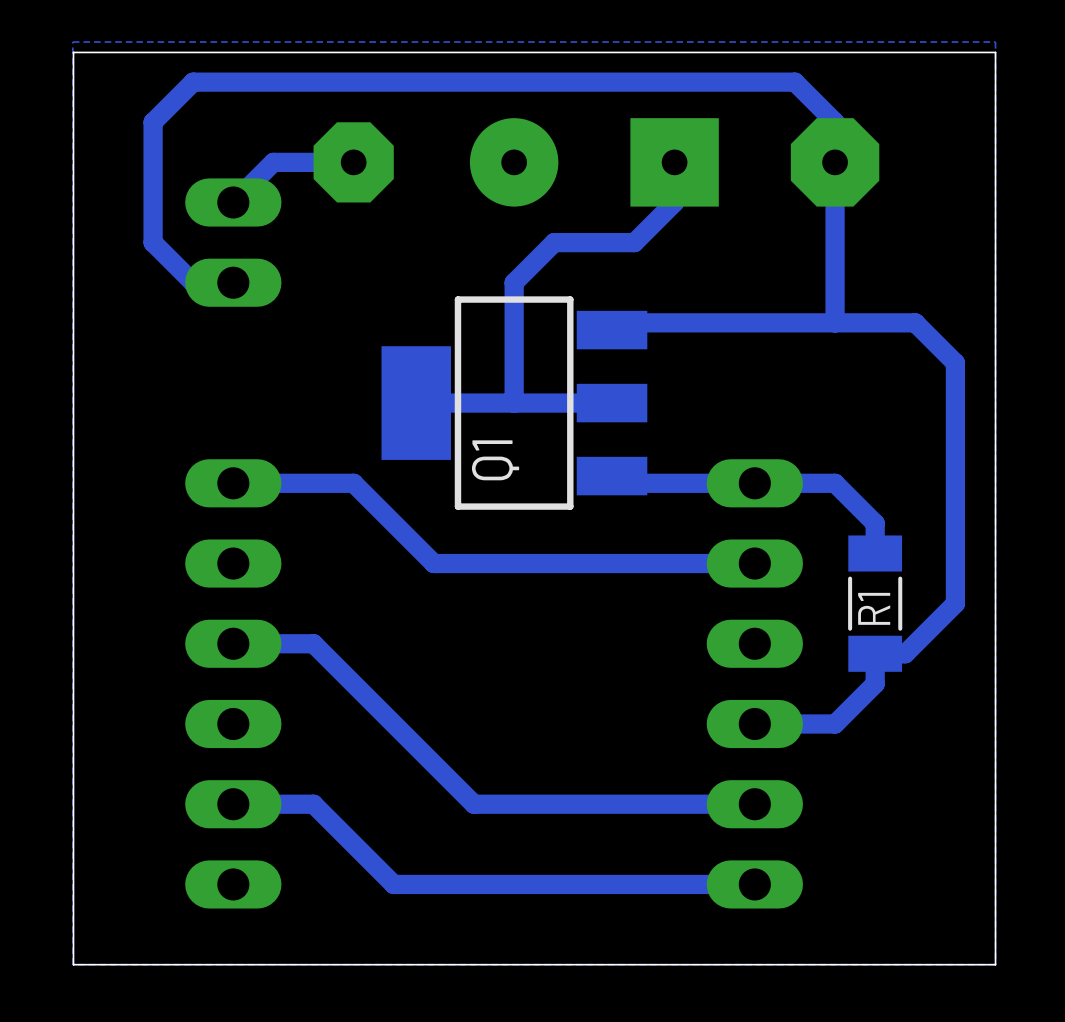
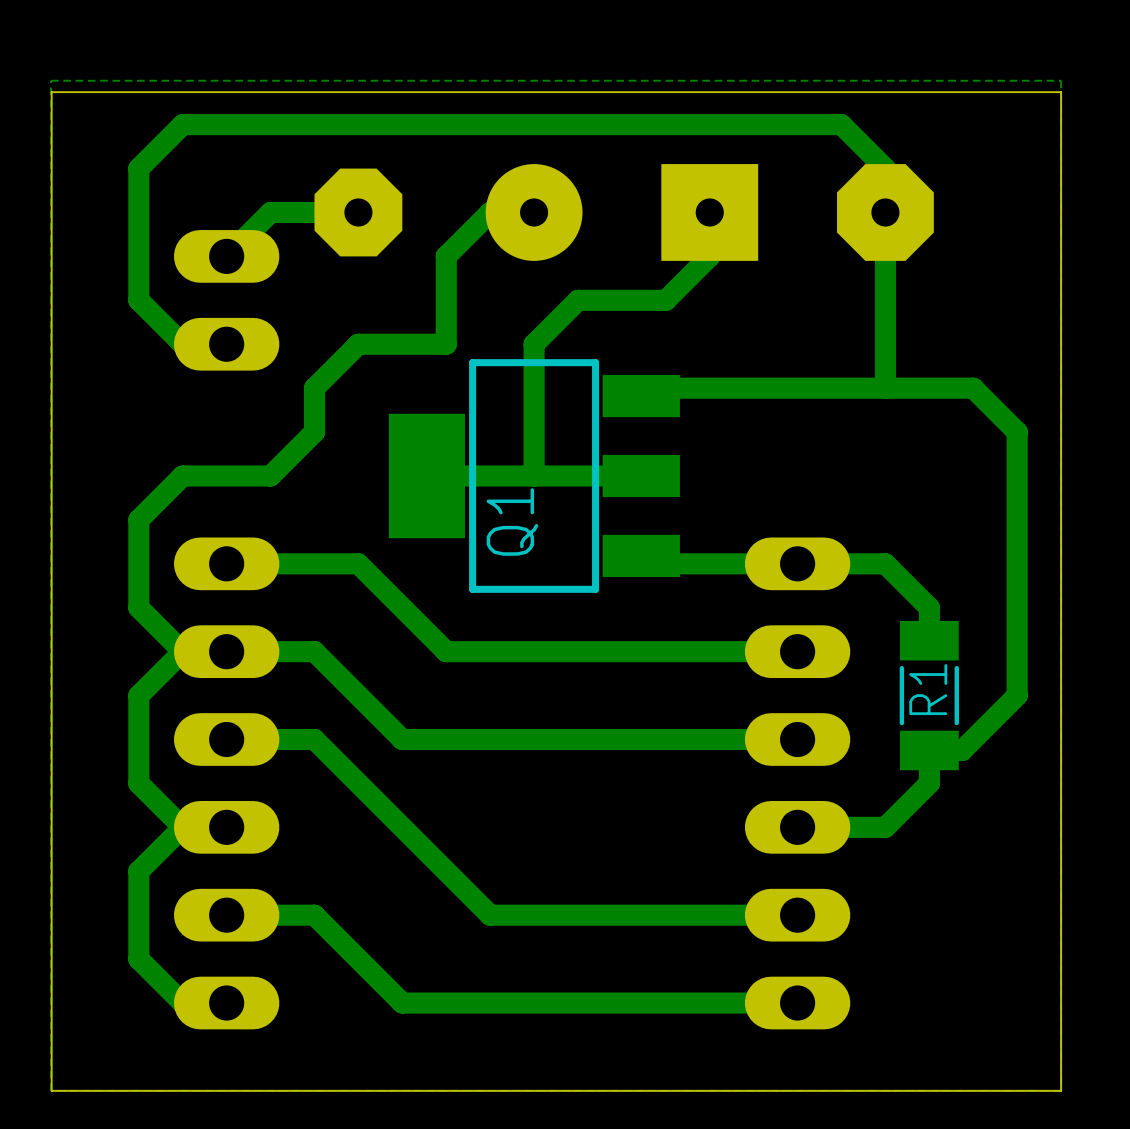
bottom track: none -> (534, 212) (490, 212) (446, 256) (446, 344) (358, 344) (314, 388) (314, 432) (270, 476) (182, 476) (138, 519) (138, 607) (182, 651)
bottom track: none -> (182, 651) (314, 651) (402, 739) (797, 739)
bottom track: none -> (182, 651) (138, 695) (138, 783) (182, 827)
bottom track: none -> (182, 827) (138, 871) (138, 959) (182, 1003) (226, 1003)

